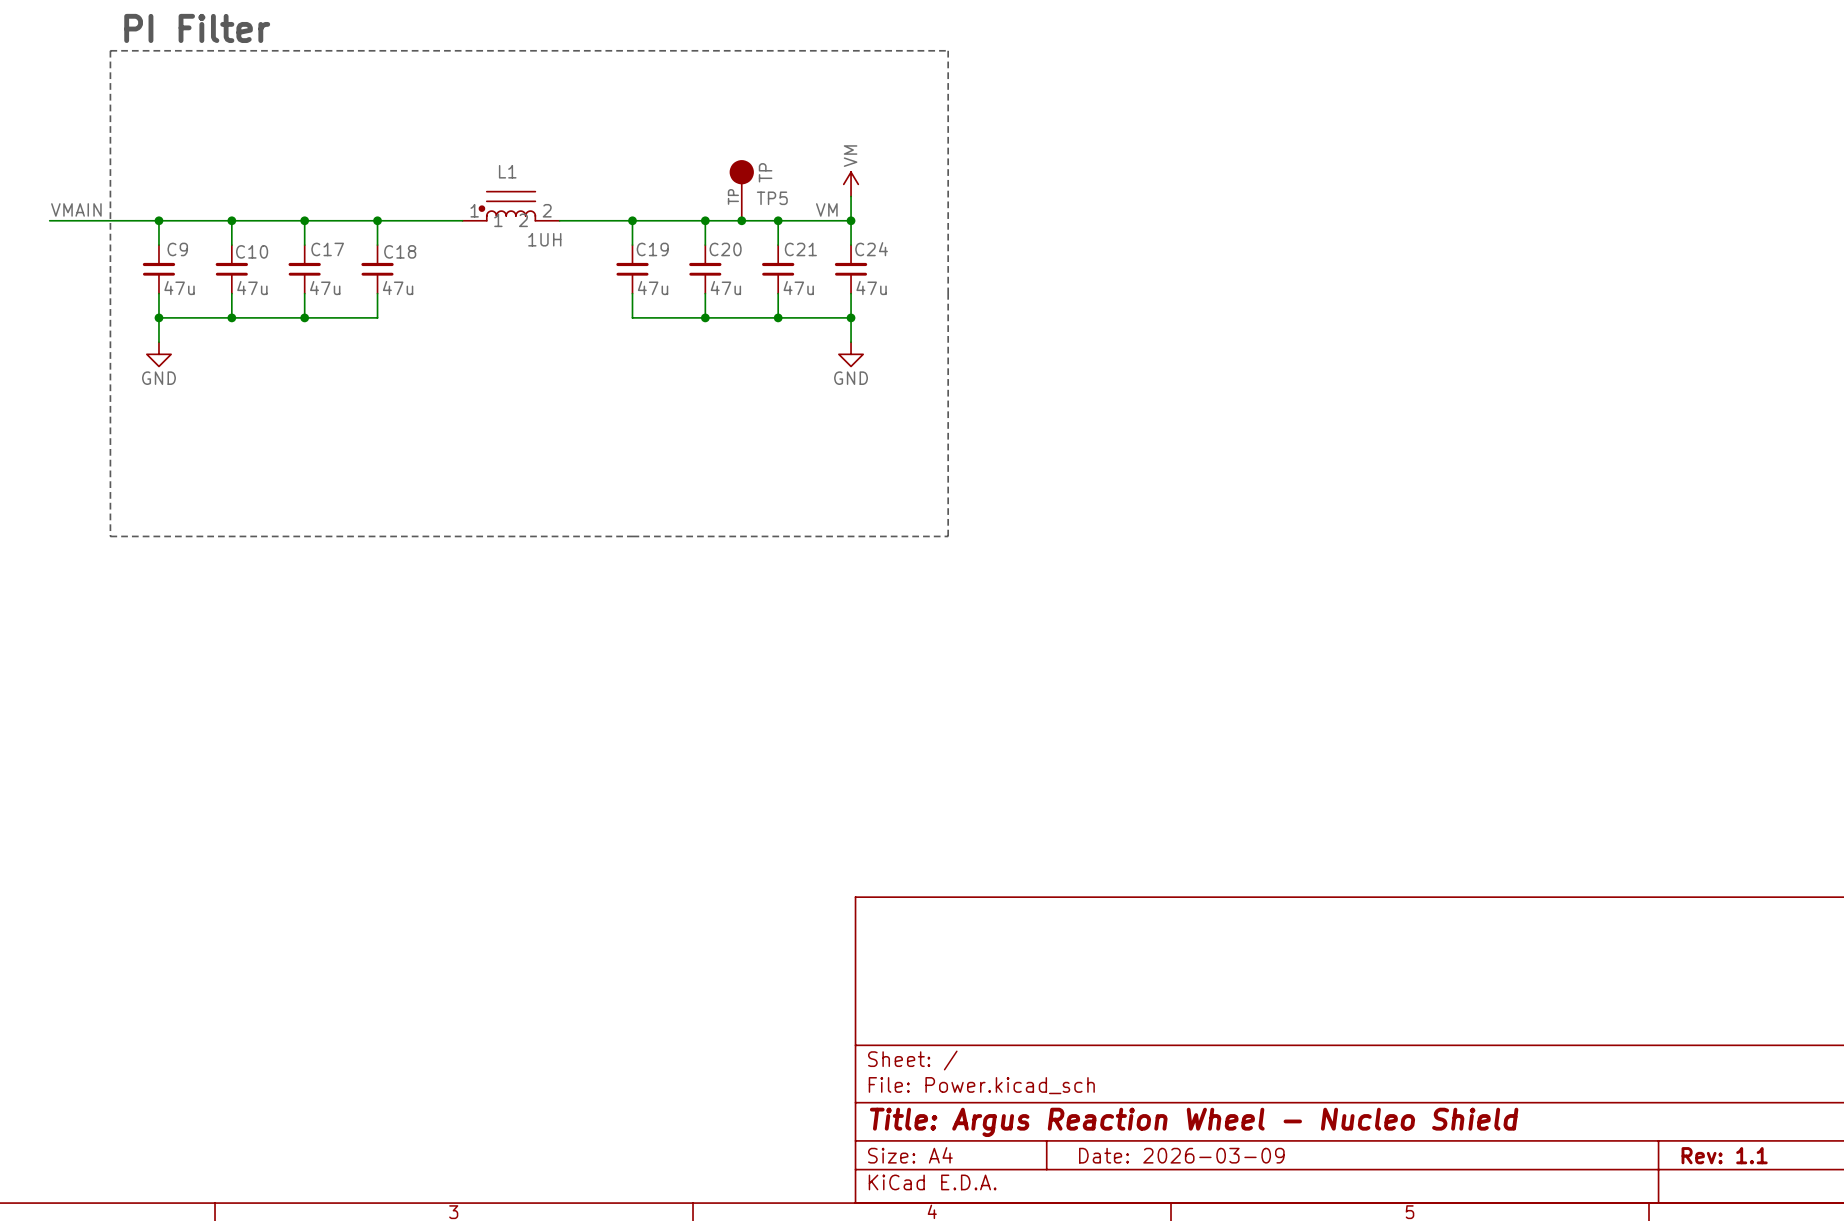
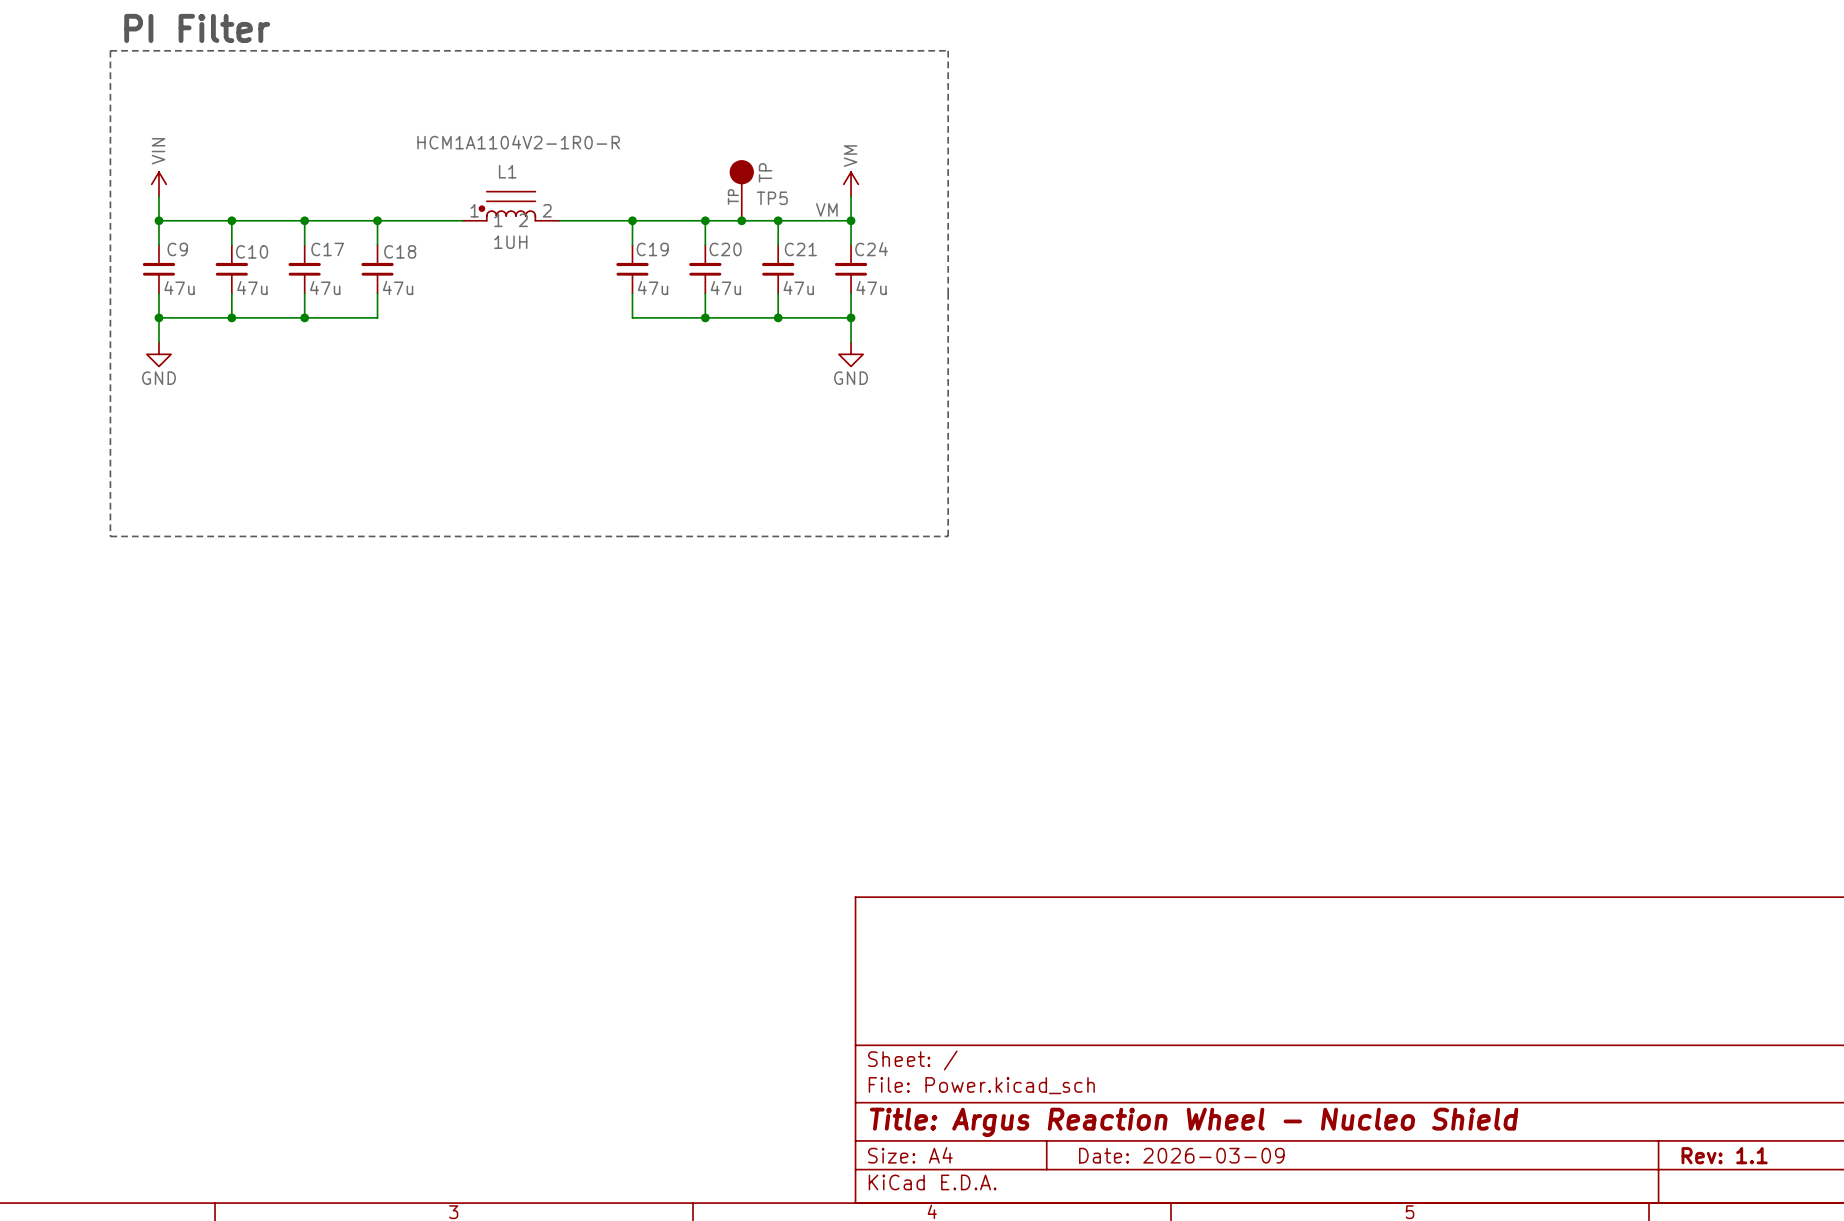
L1 text: none -> HCM1A1104V2-1R0-R (518, 142)
power symbol: none -> VIN (158, 184)
label: VMAIN (76, 209) -> none
wire: (49, 220) (158, 220) -> (158, 196) (158, 220)
L1 value position: 1UH (544, 239) -> 1UH (510, 242)

